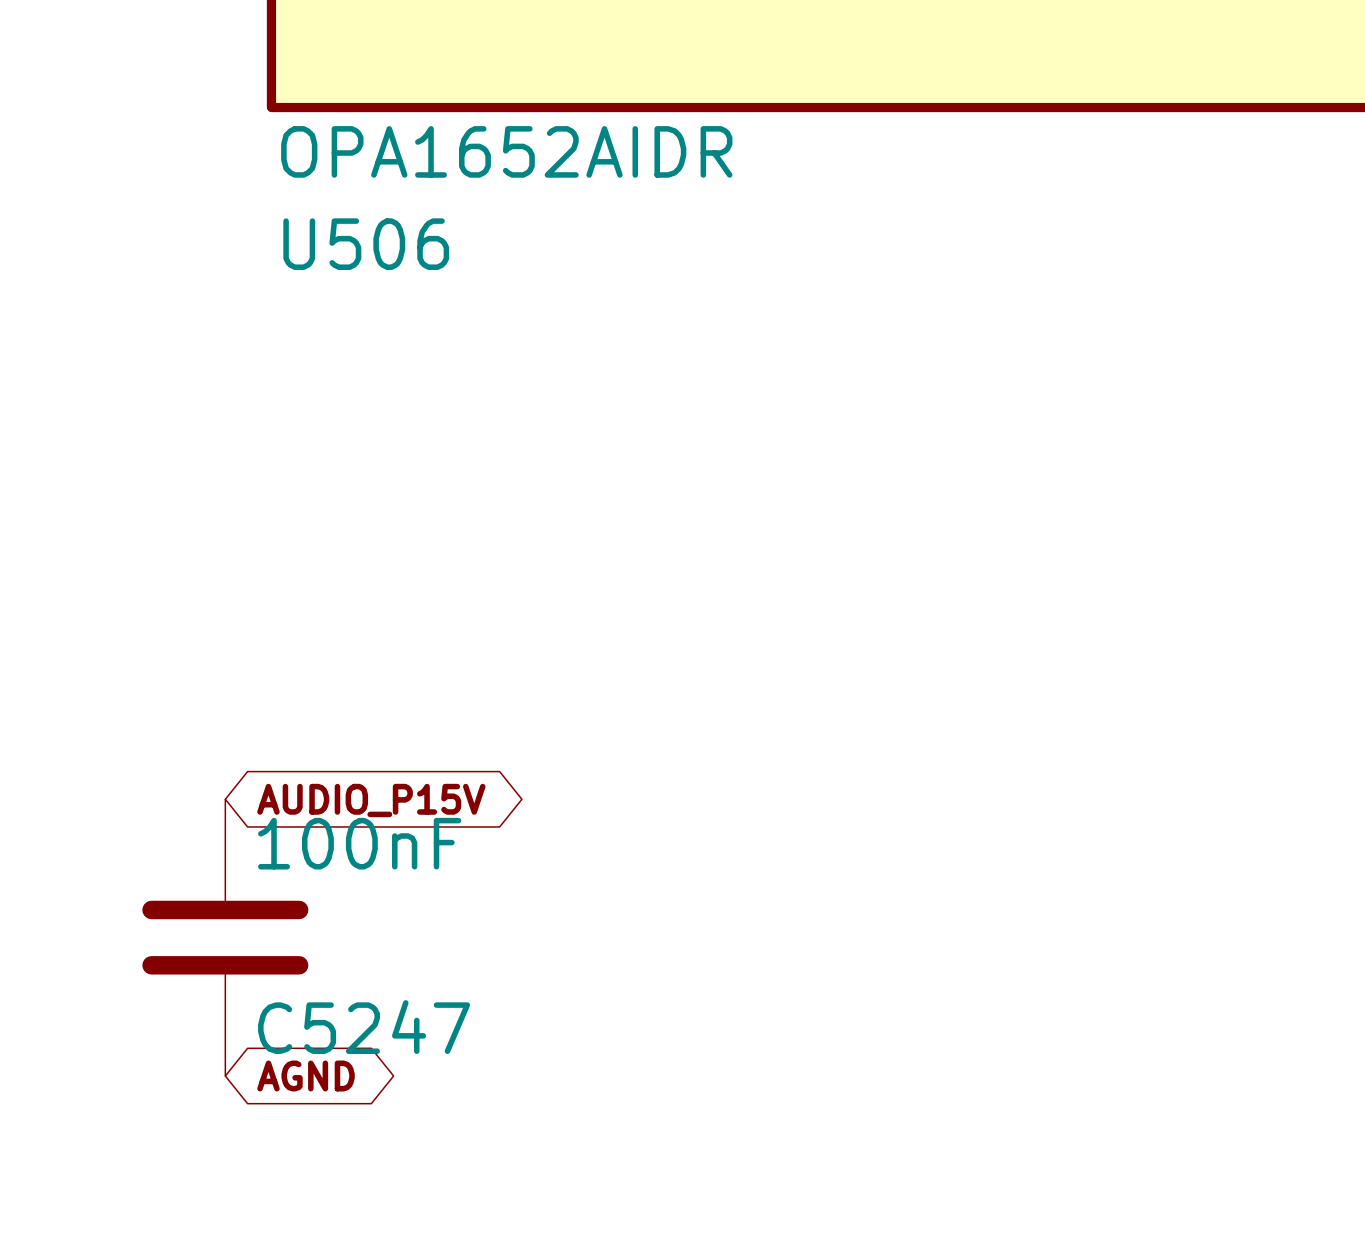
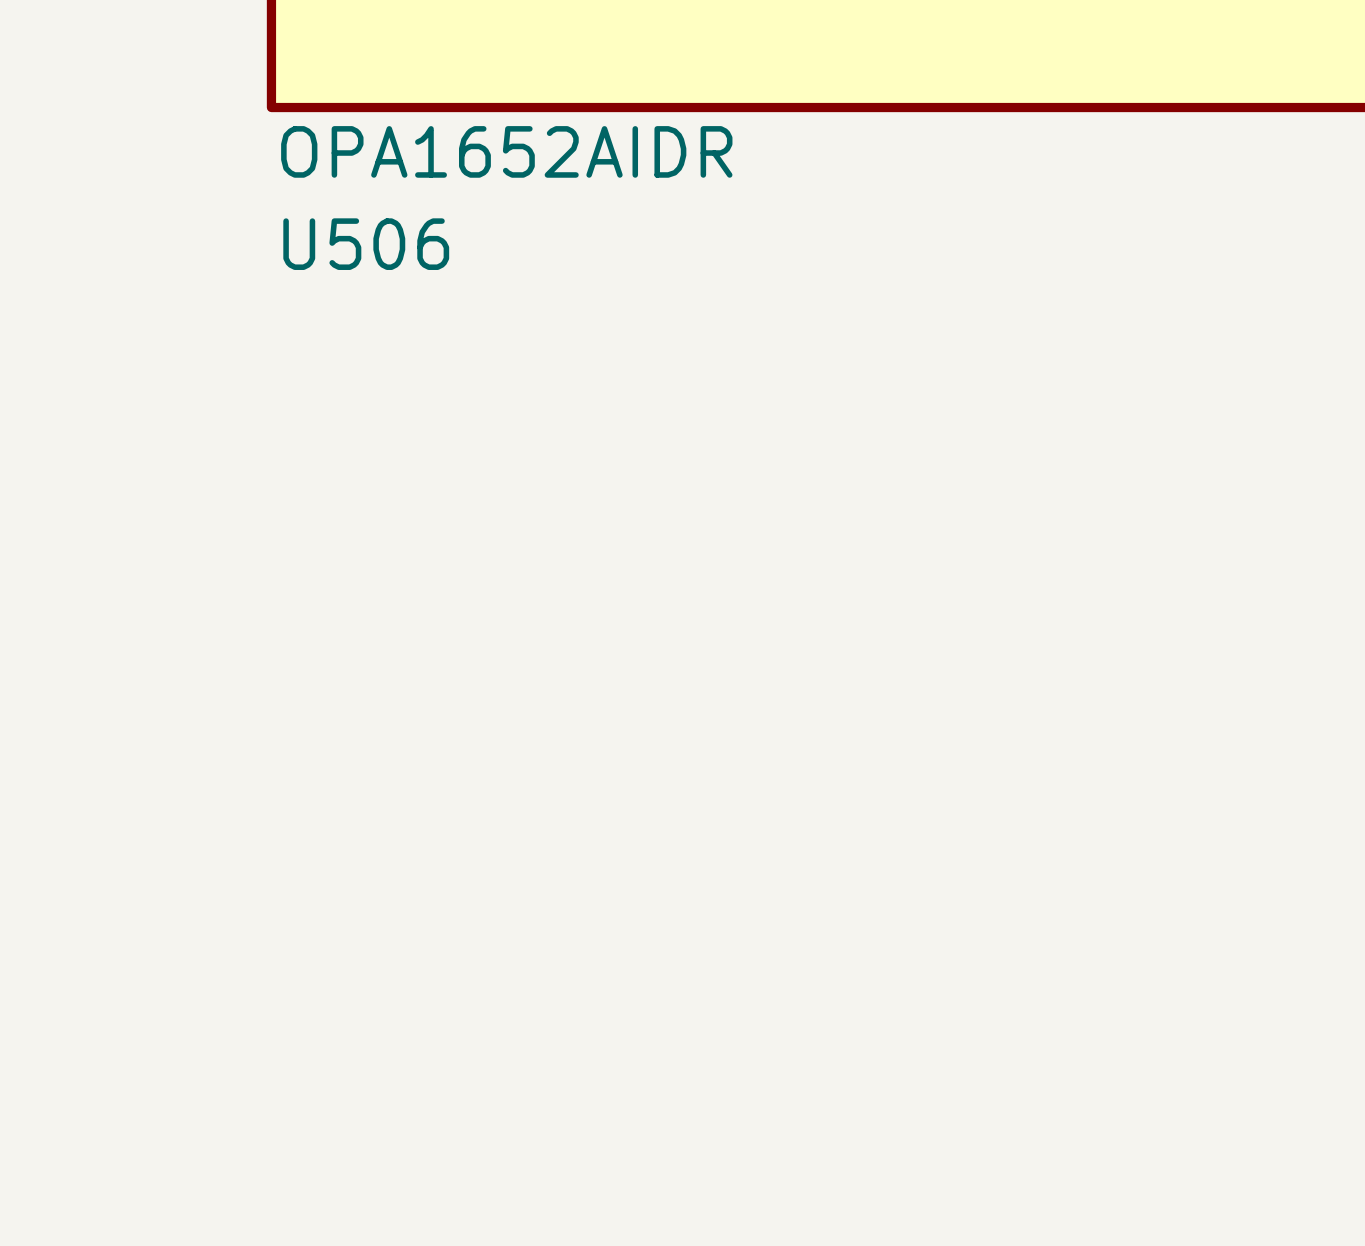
global label: AUDIO_P15V (371, 800) -> none
C5247: 100nF (225, 937) -> none
global label: AGND (306, 1075) -> none

